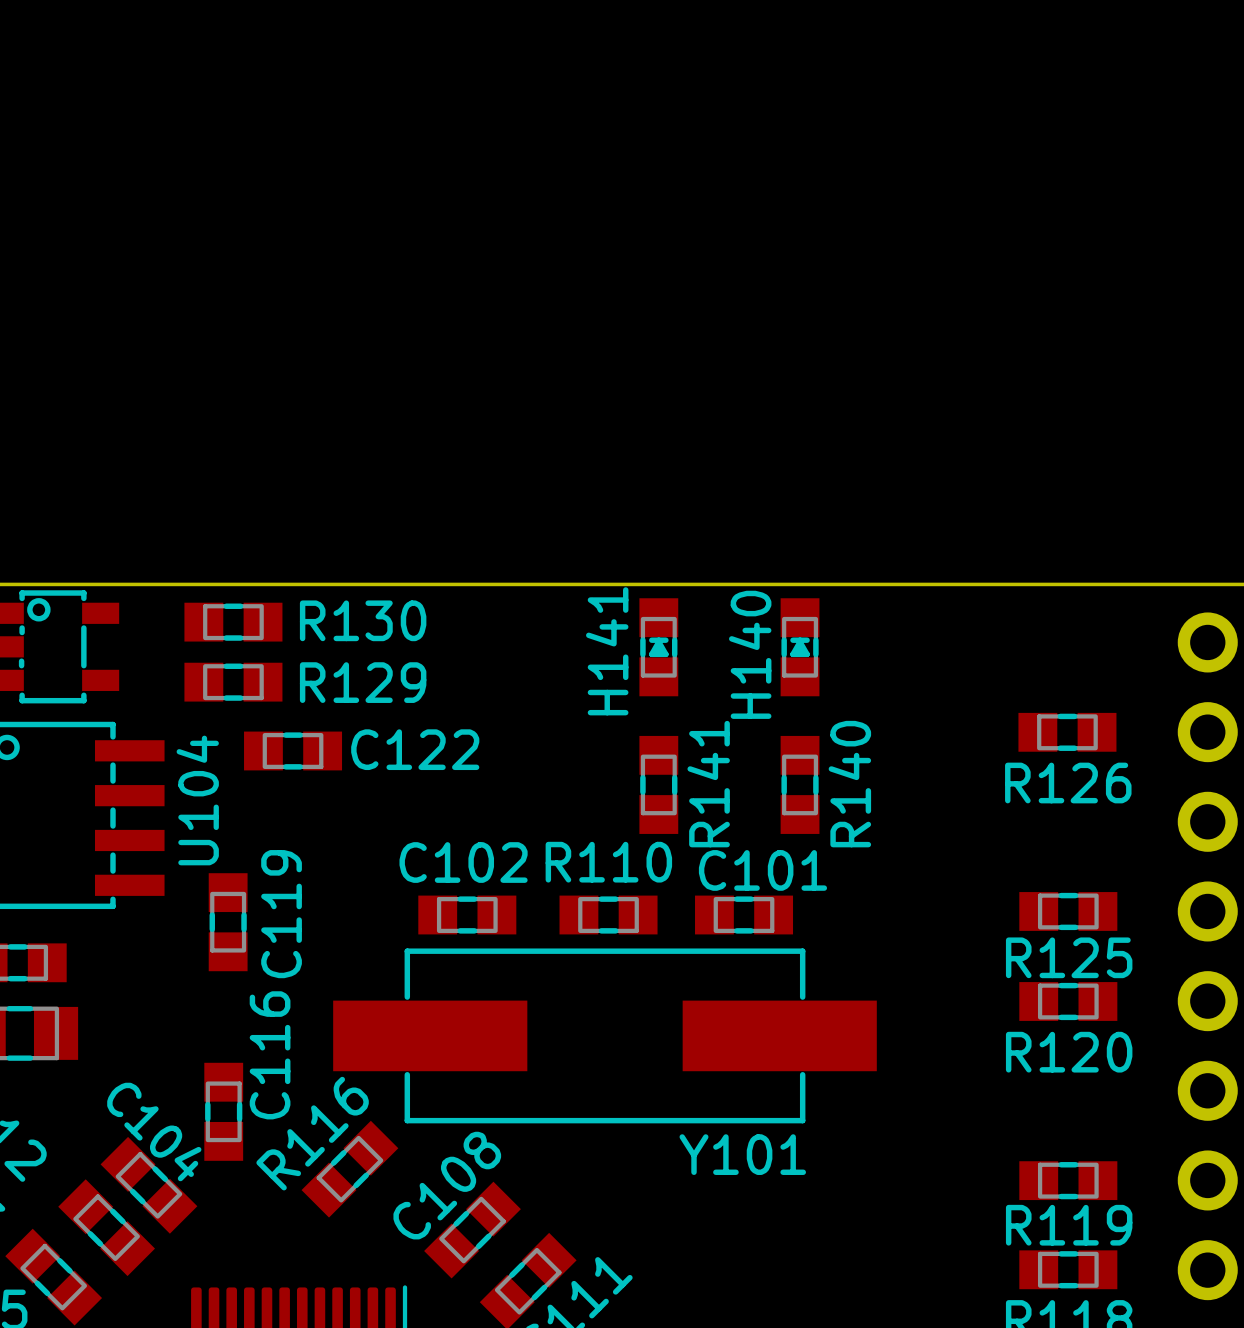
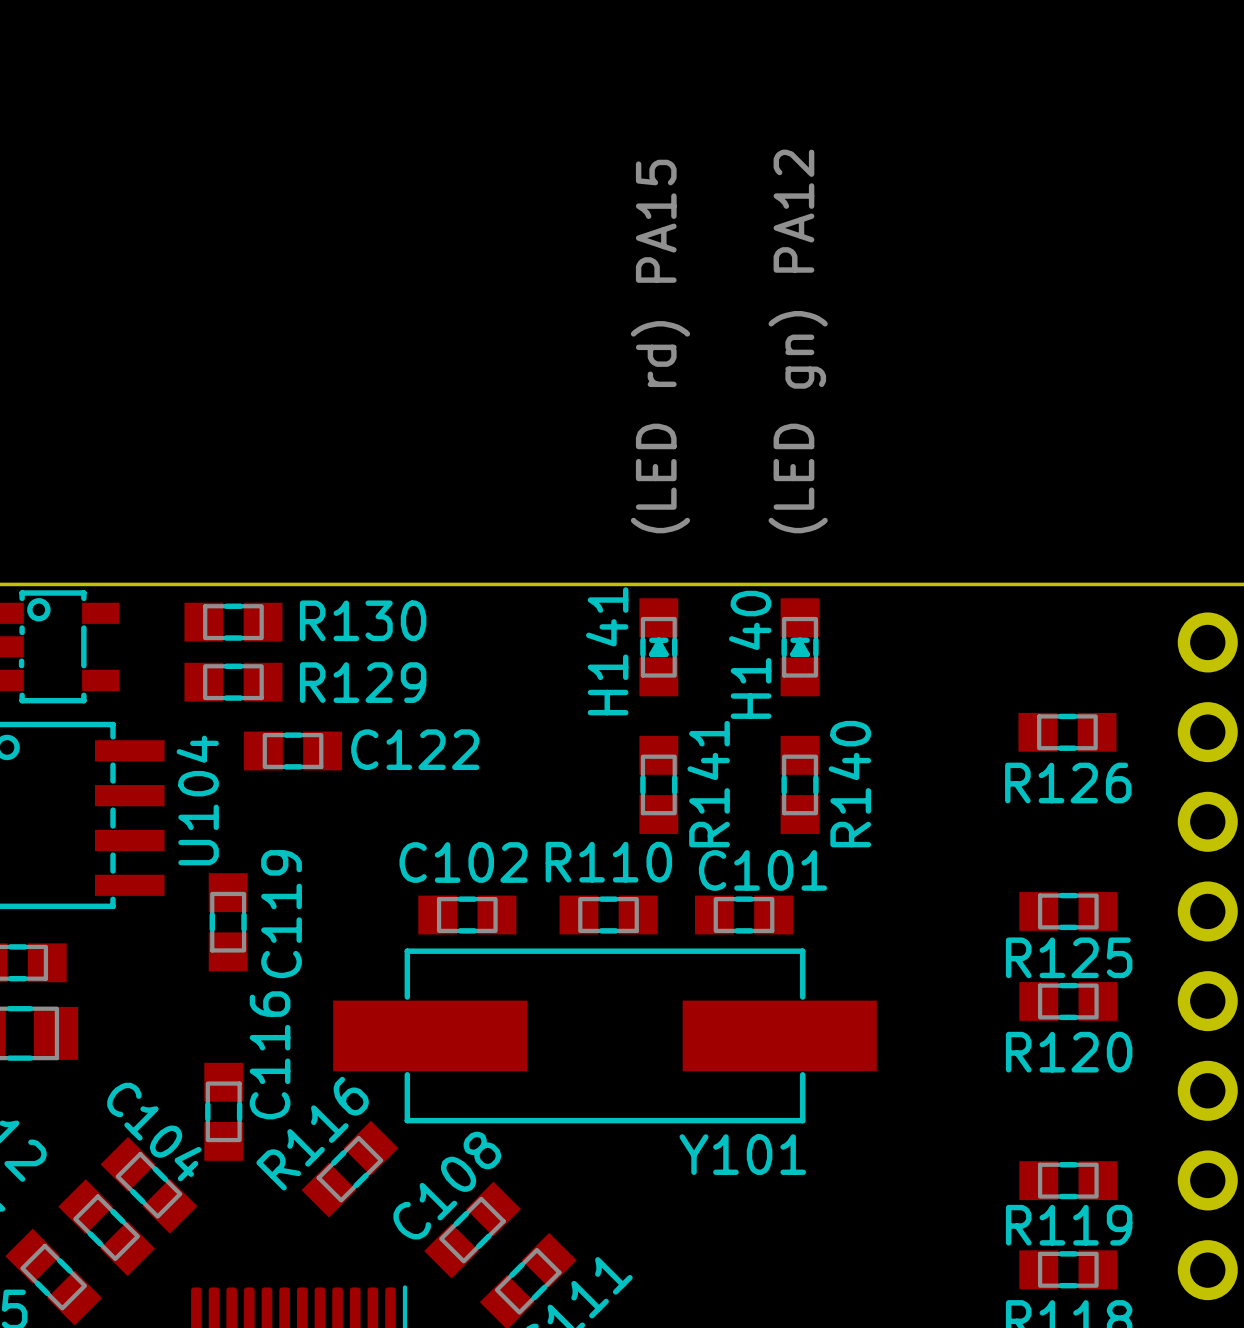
text: none -> (LED gn) PA12 (798, 341)
text: none -> (LED rd) PA15 (660, 346)

